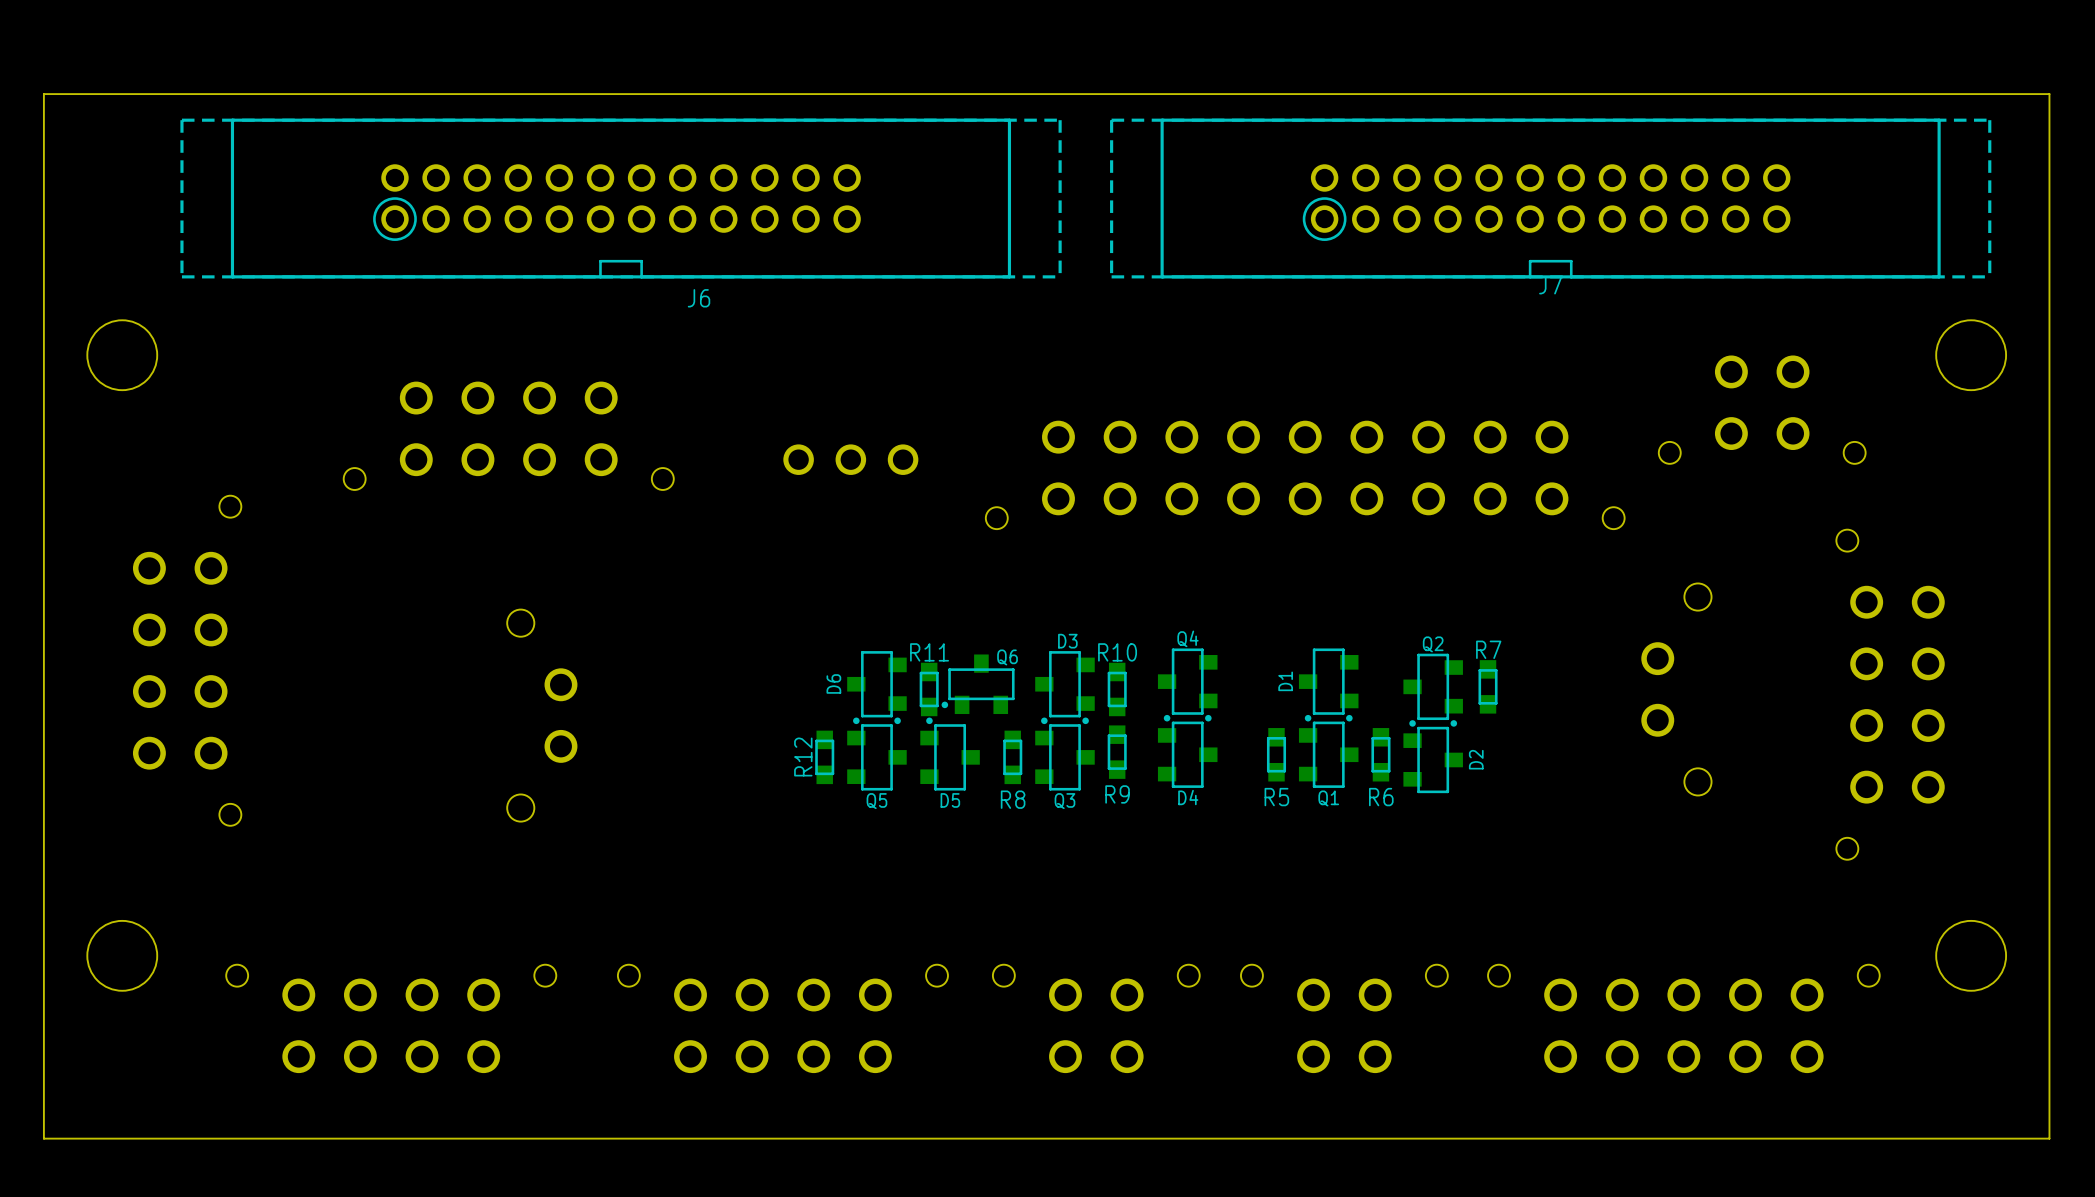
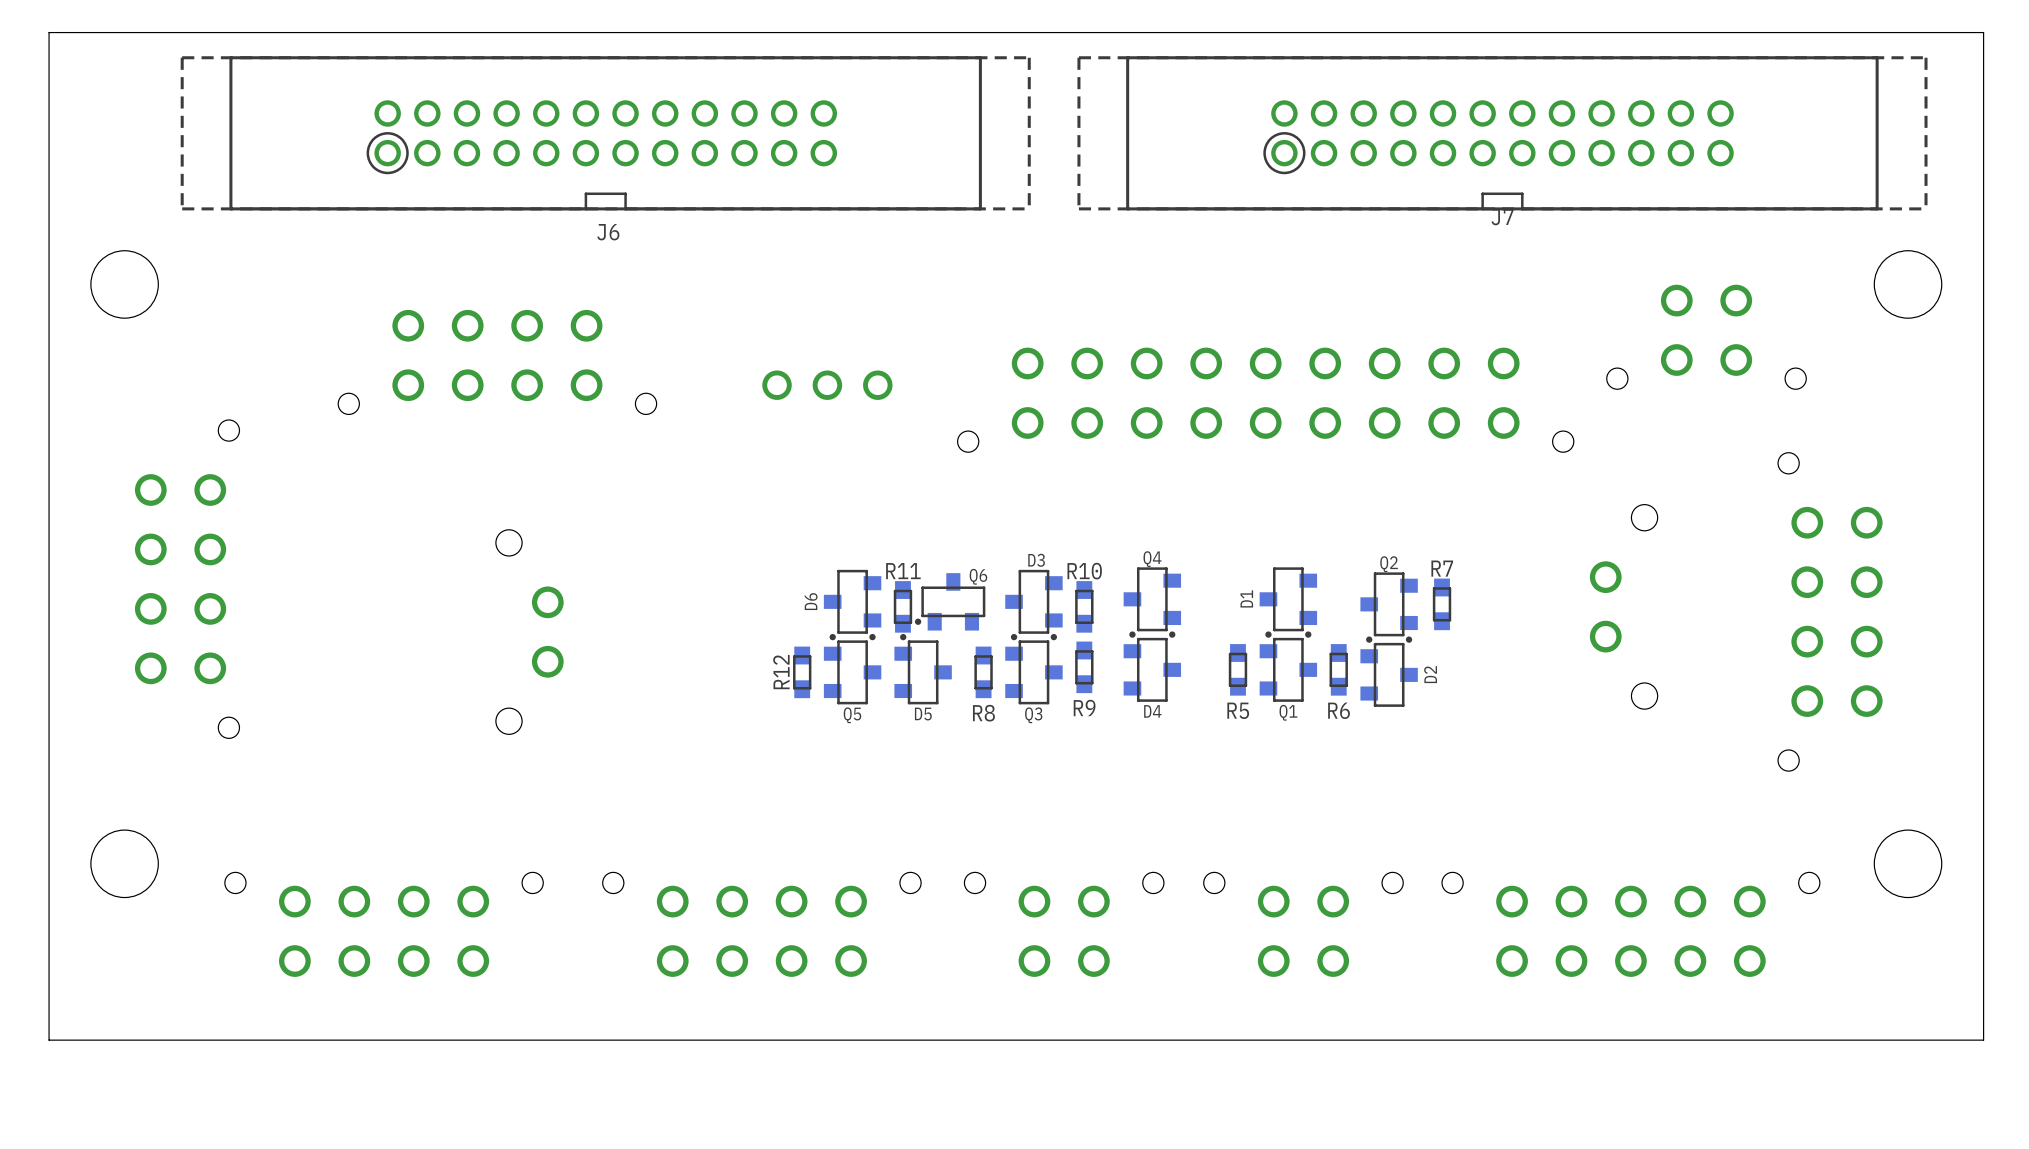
J6 name position: J6 (699, 298) -> J6 (608, 232)

